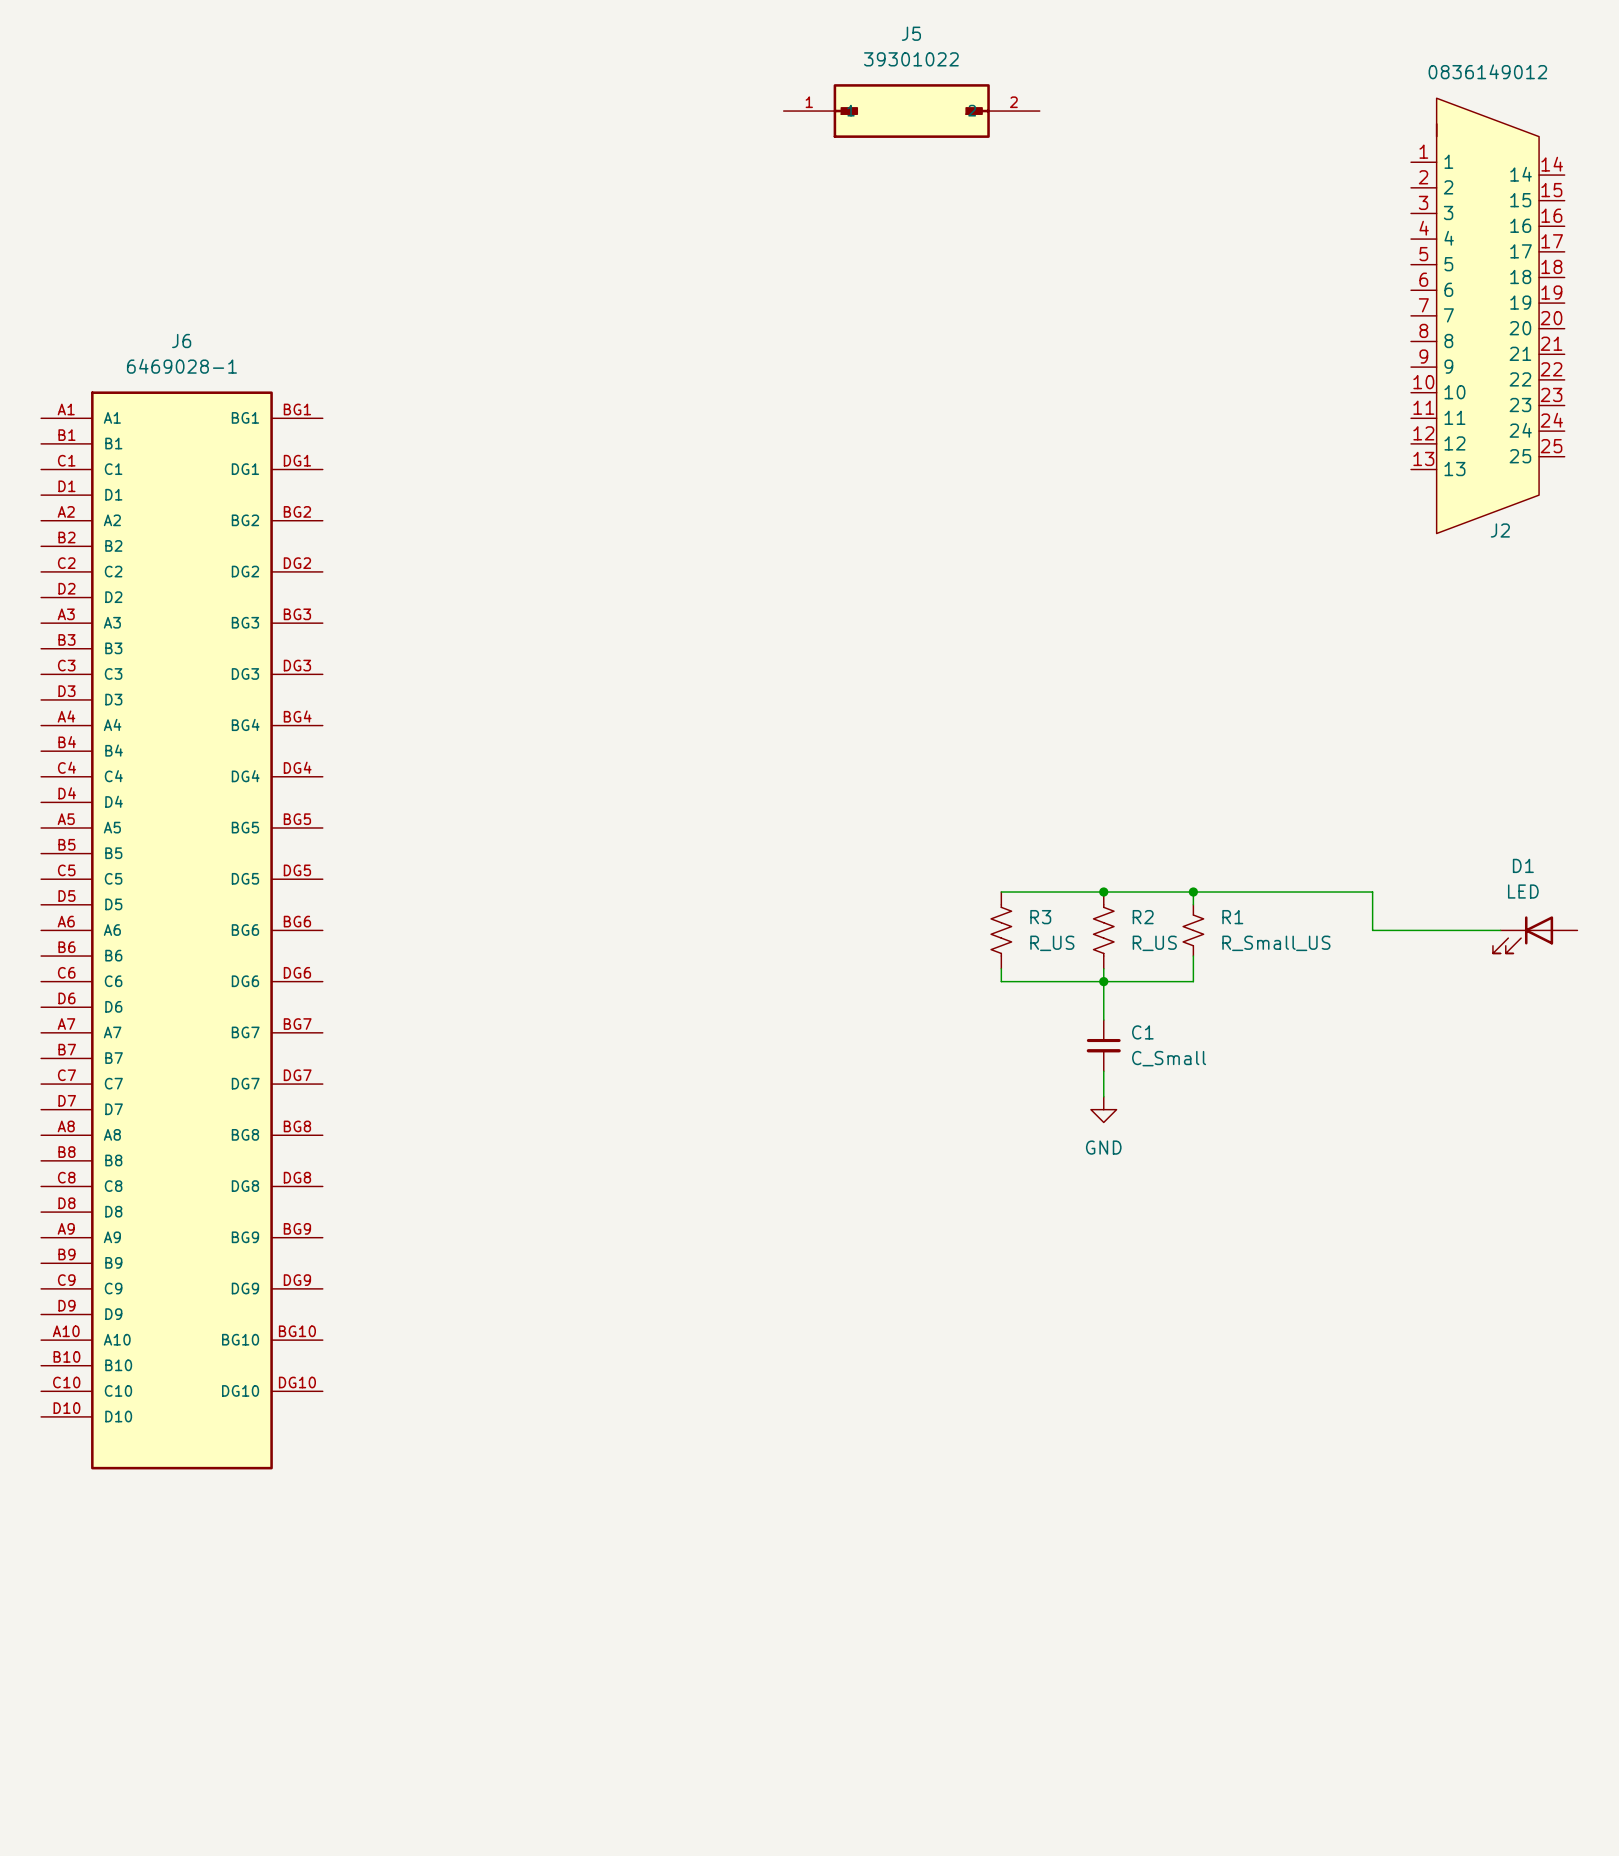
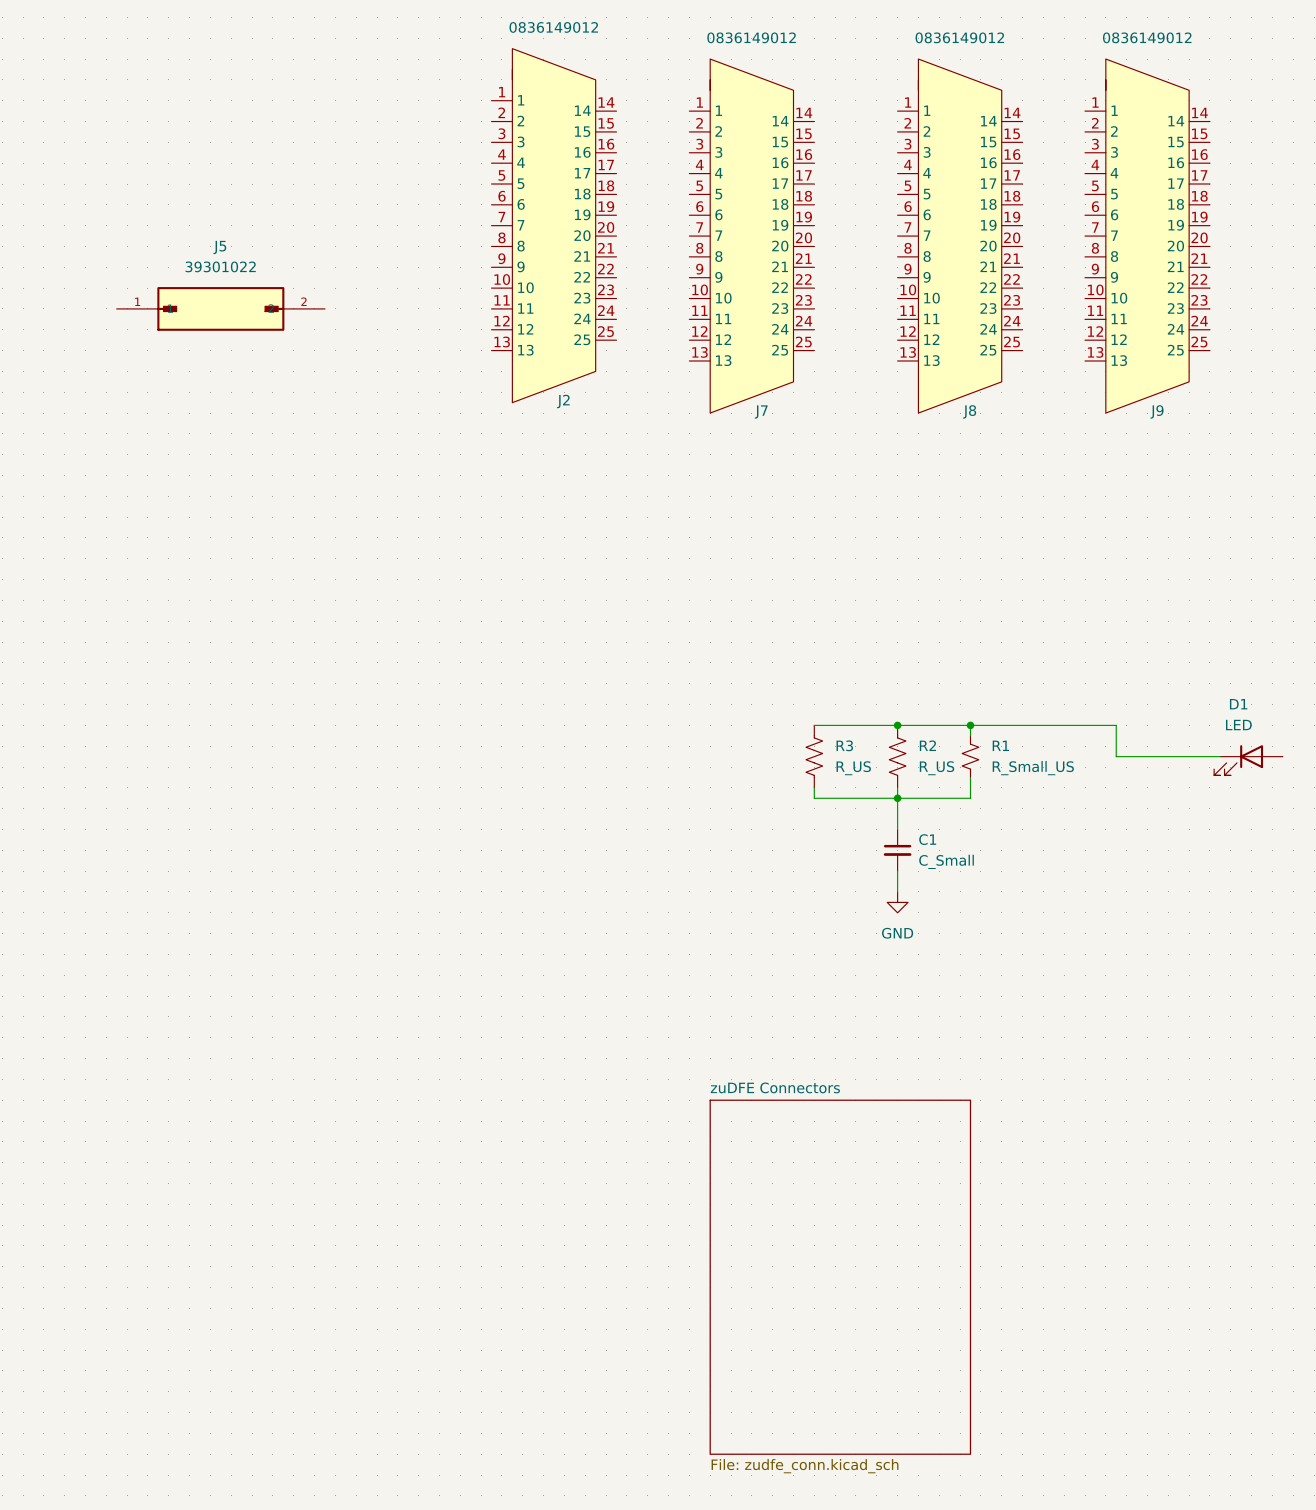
J5 position: (911, 111) -> (220, 308)
J7: none -> 0836149012 (751, 236)
J8: none -> 0836149012 (960, 236)
J9: none -> 0836149012 (1147, 236)
J2 position: (1487, 315) -> (554, 225)
J6: 6469028-1 (181, 930) -> none
sheet zuDFE Connectors: none -> File: zudfe_conn.kicad_sch (840, 1277)

